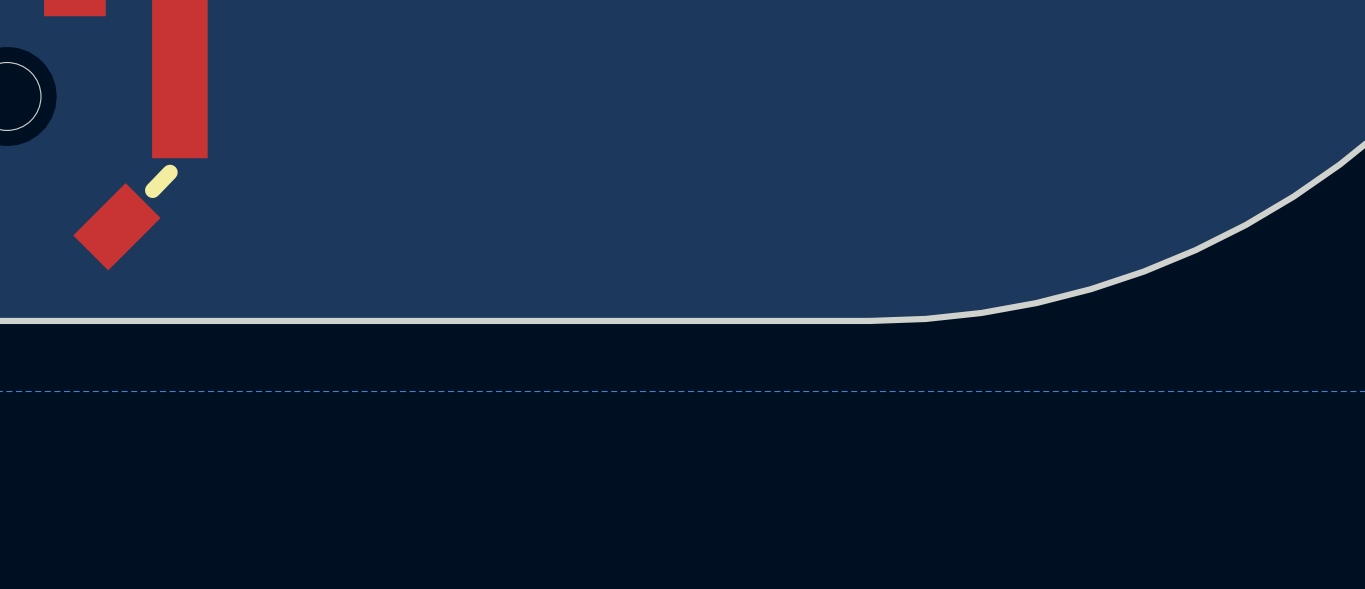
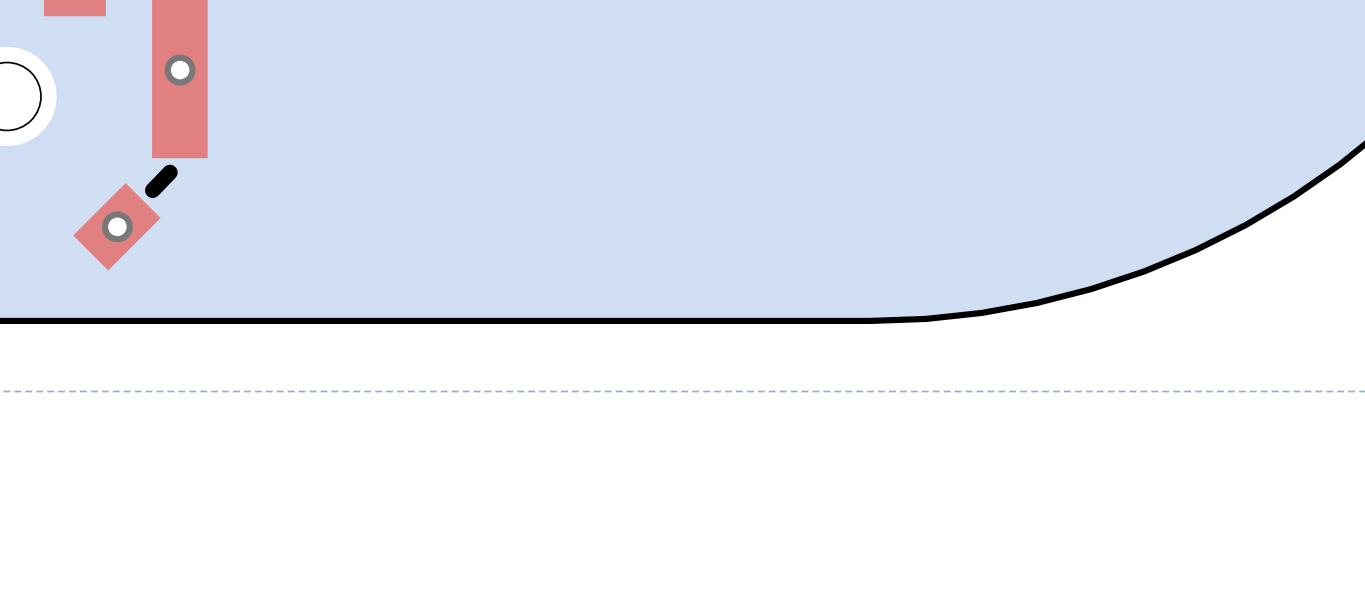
via: none -> (180, 70)
via: none -> (117, 226)

